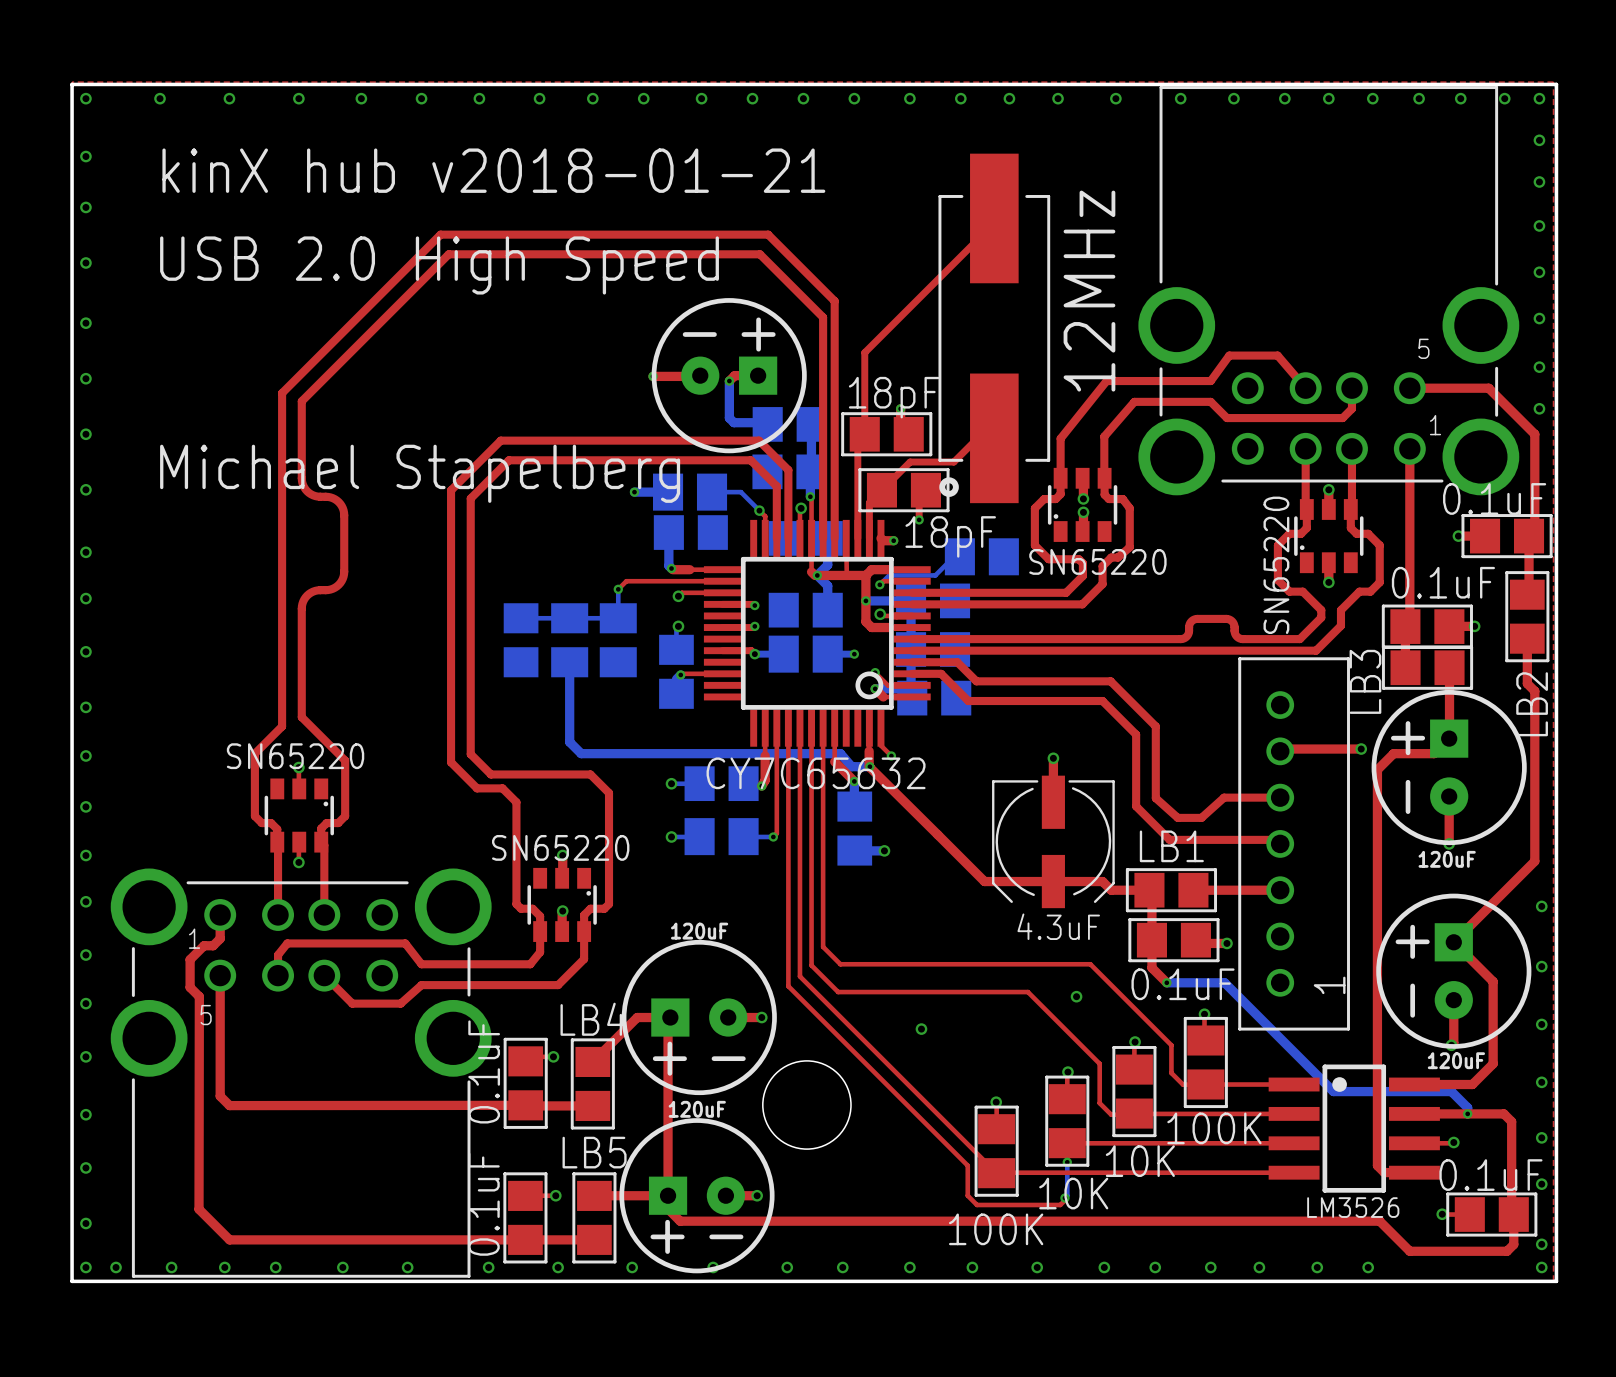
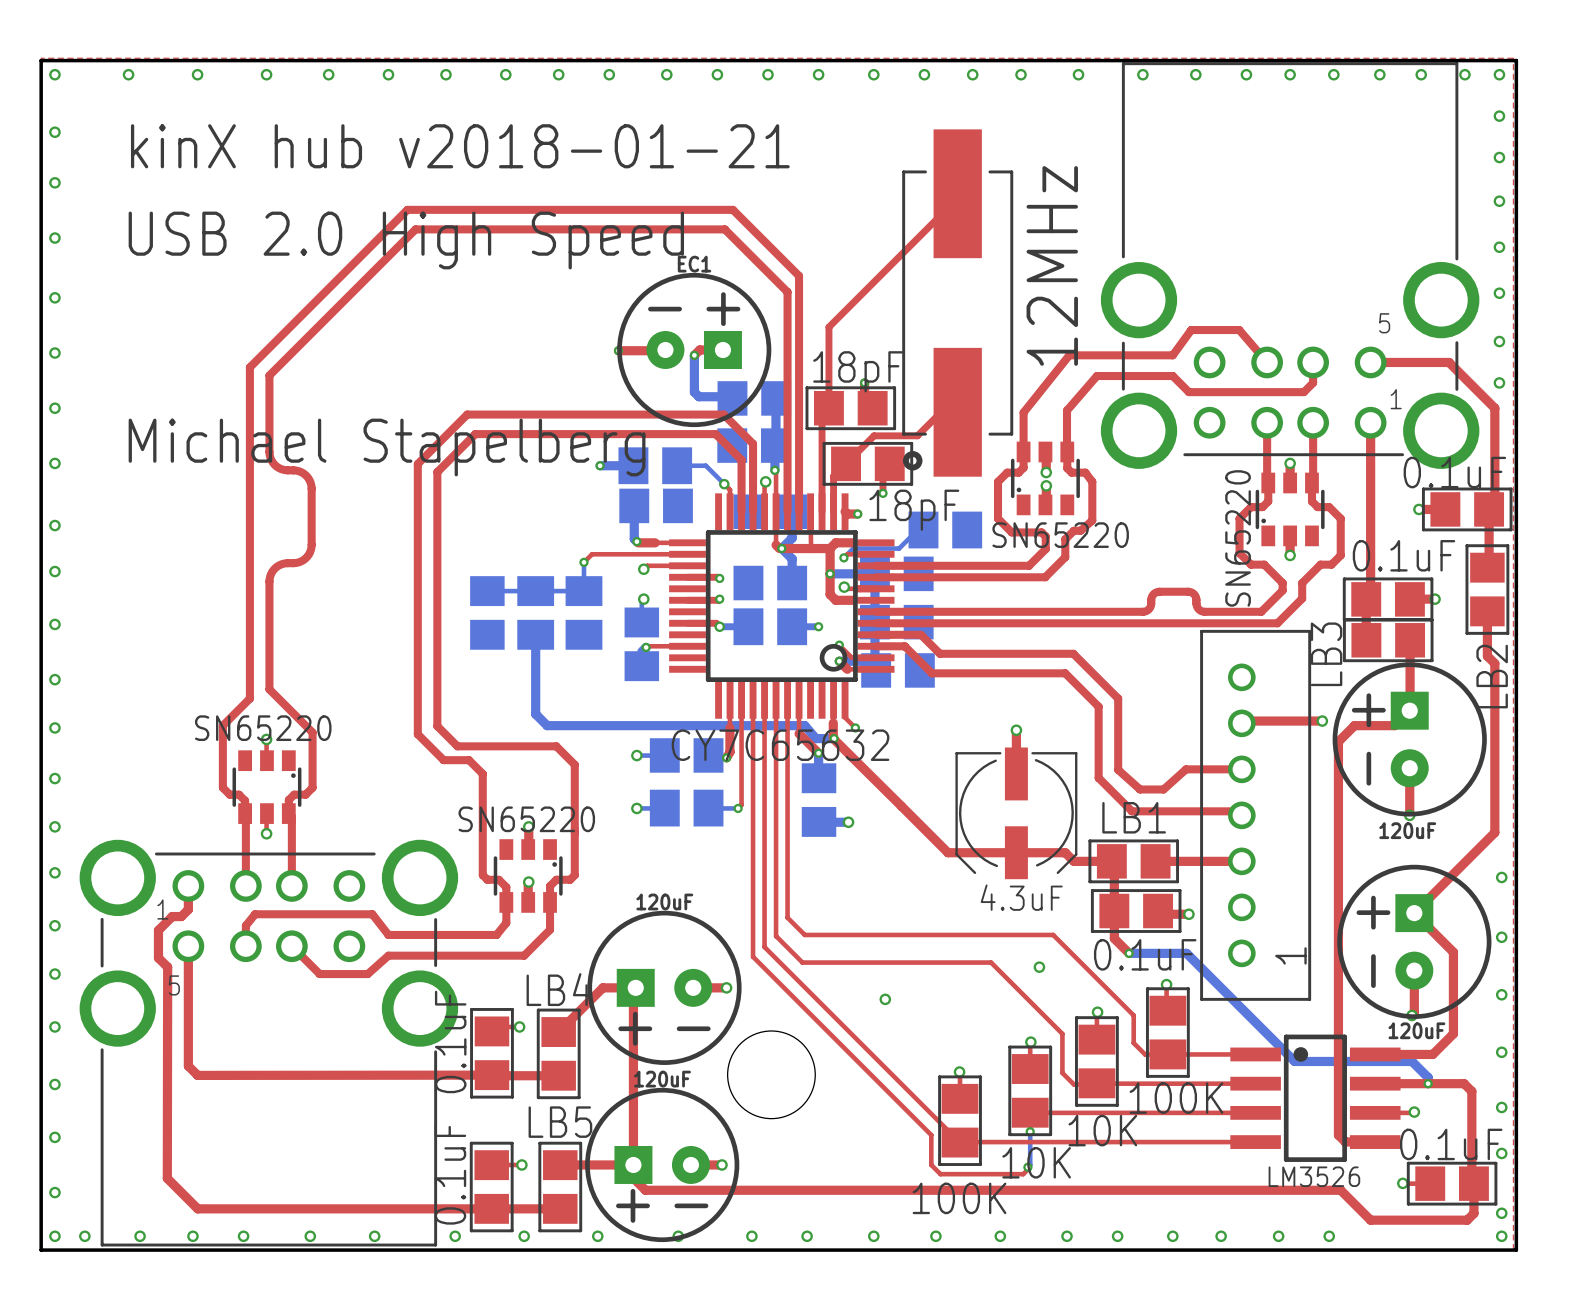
EC1 name: none -> EC1 (694, 264)

